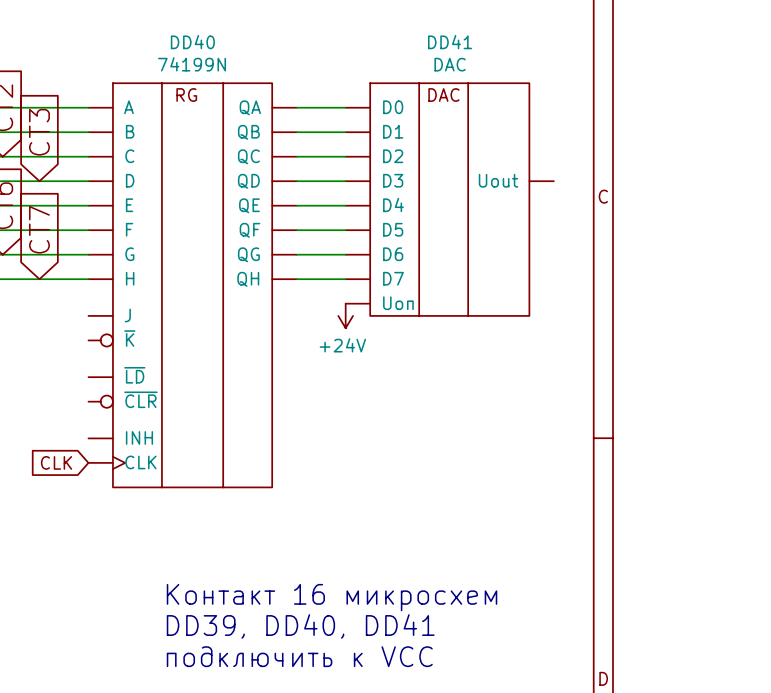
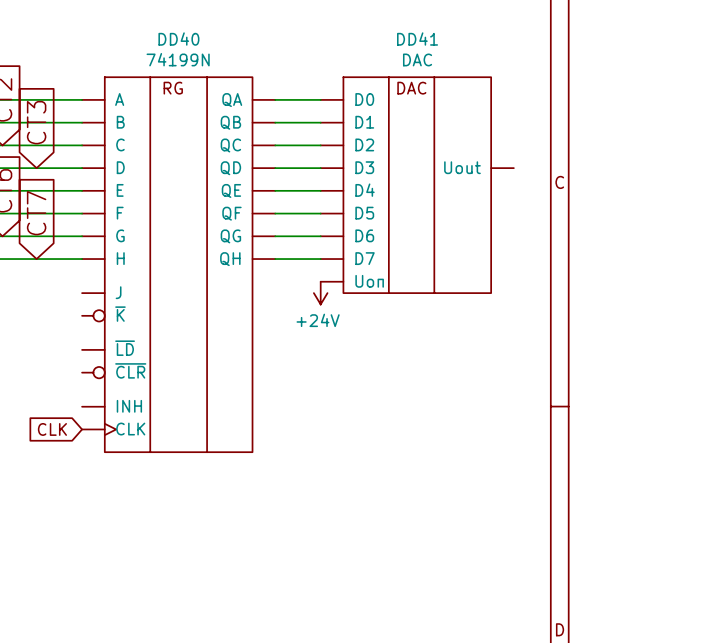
text: Контакт 16 микросхем (332, 597) -> none
text: DD39, DD40, DD41 (300, 626) -> none
text: подключить к VCC (299, 656) -> none

